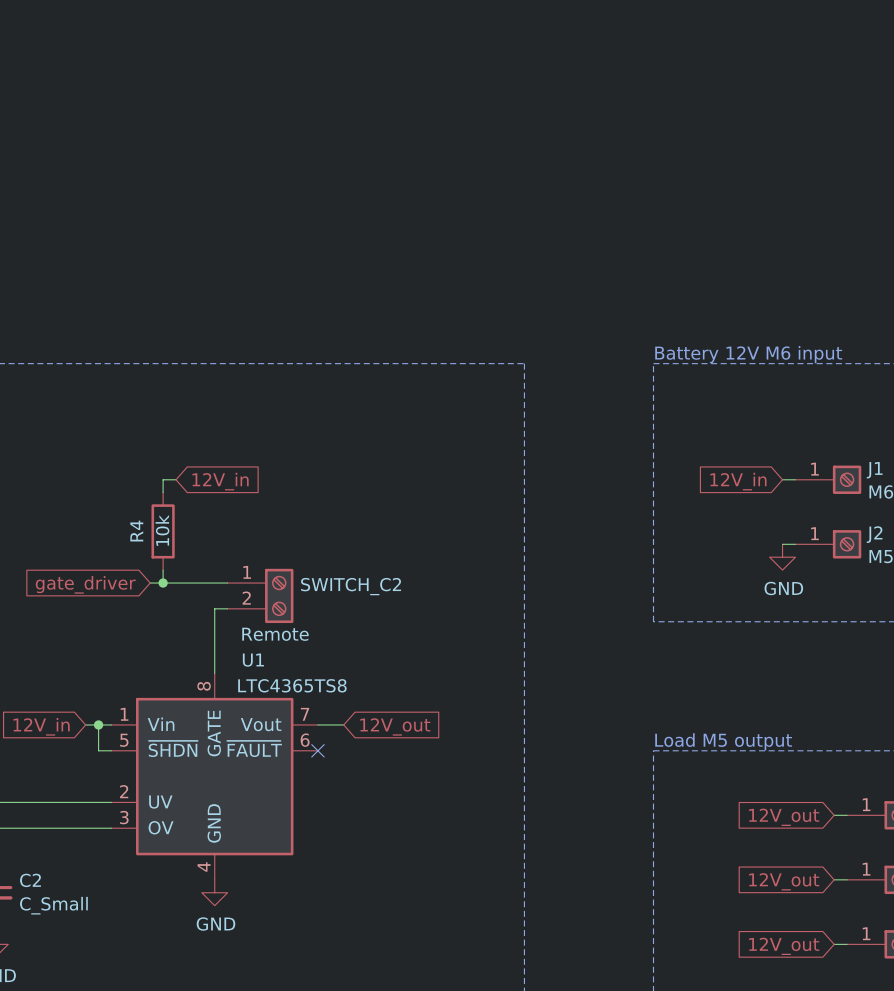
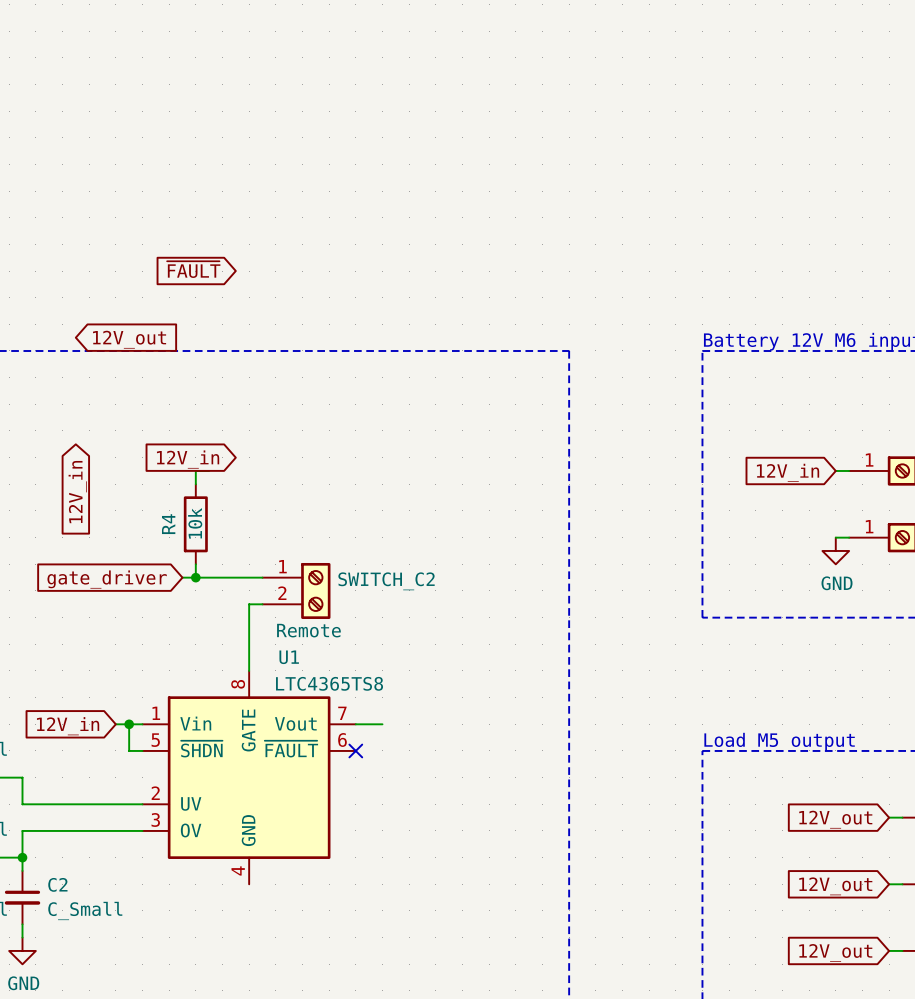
global label: none -> ~{FAULT} (193, 269)
global label: none -> 12V_out (129, 339)
global label rotation: 0° (220, 481) -> 180° (188, 459)
global label: none -> 12V_in (77, 492)
global label: 12V_out (395, 726) -> none
power symbol: GND (214, 892) -> none

